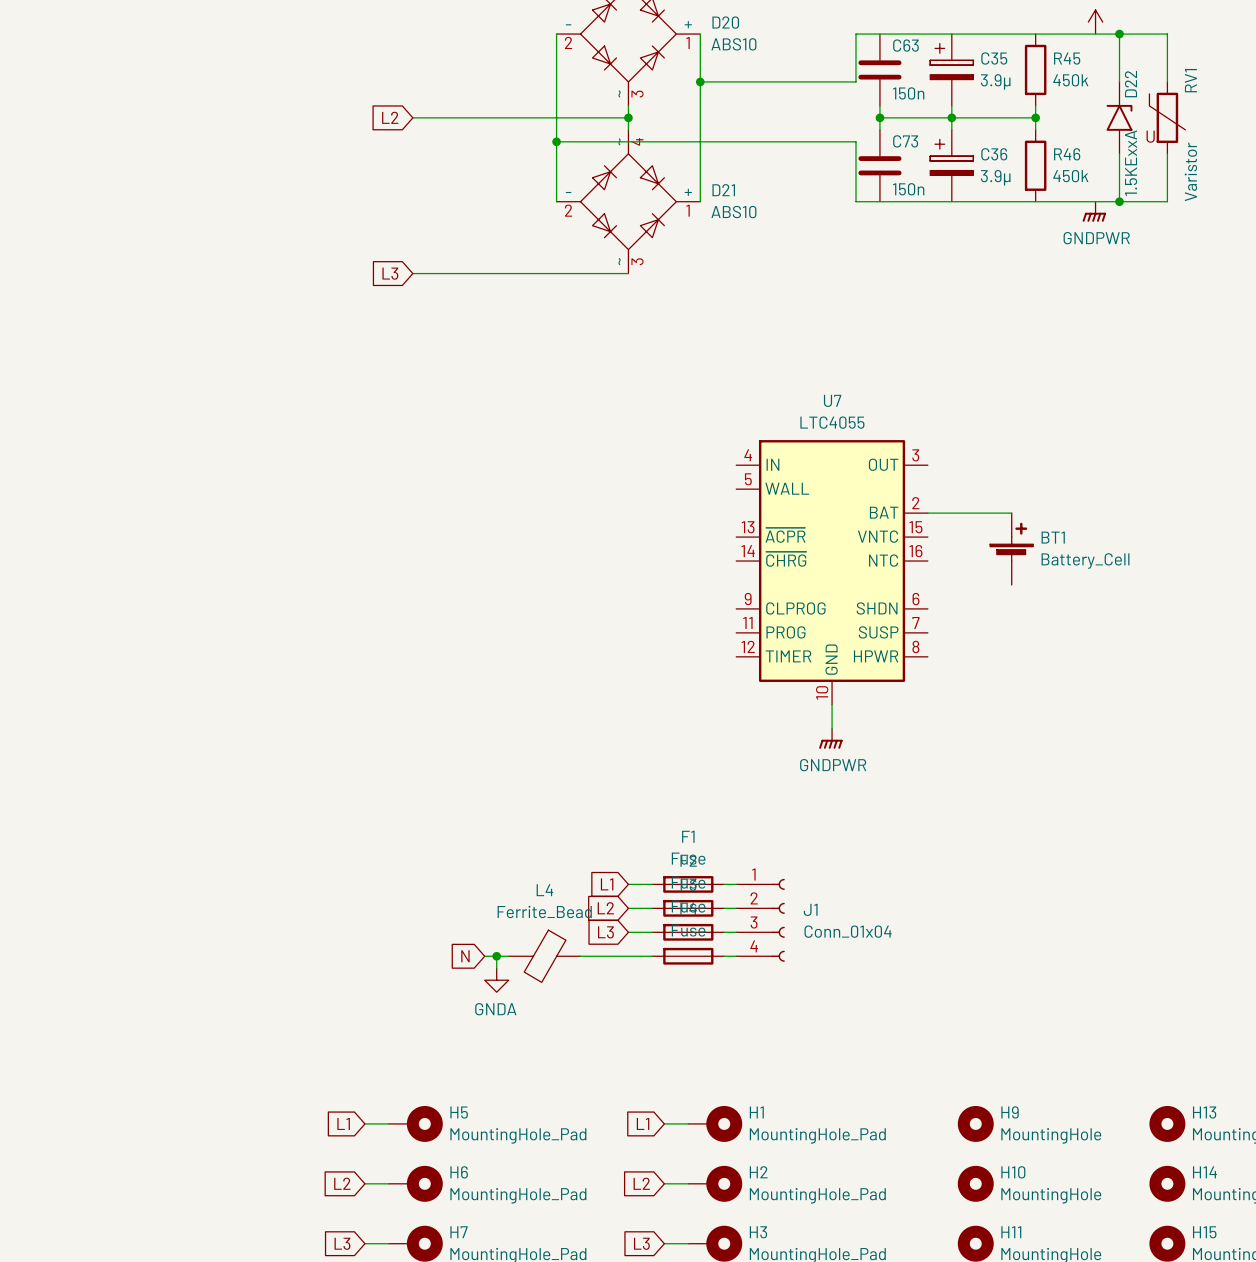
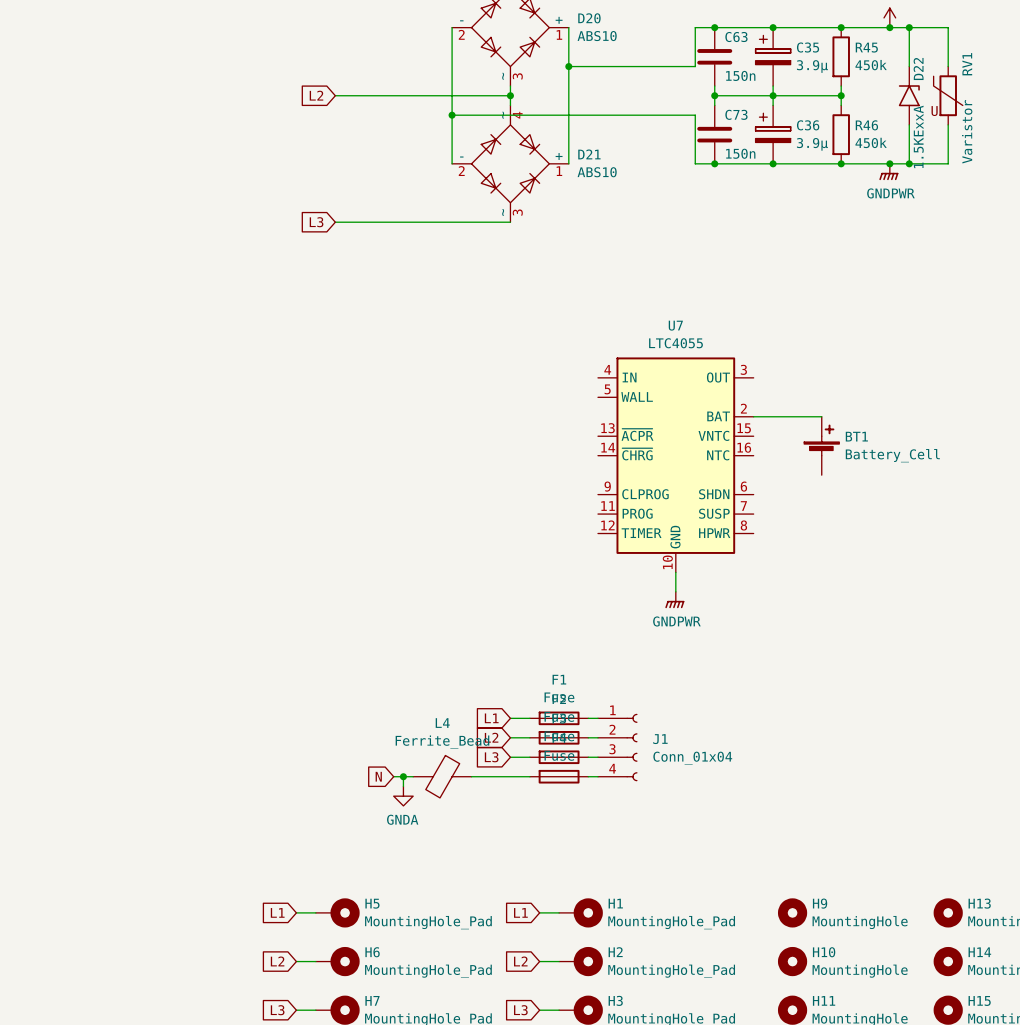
junction: none -> (714, 27)
junction: none -> (773, 27)
junction: none -> (841, 27)
junction: none -> (889, 27)
junction: none -> (714, 163)
junction: none -> (773, 163)
junction: none -> (841, 163)
junction: none -> (889, 163)

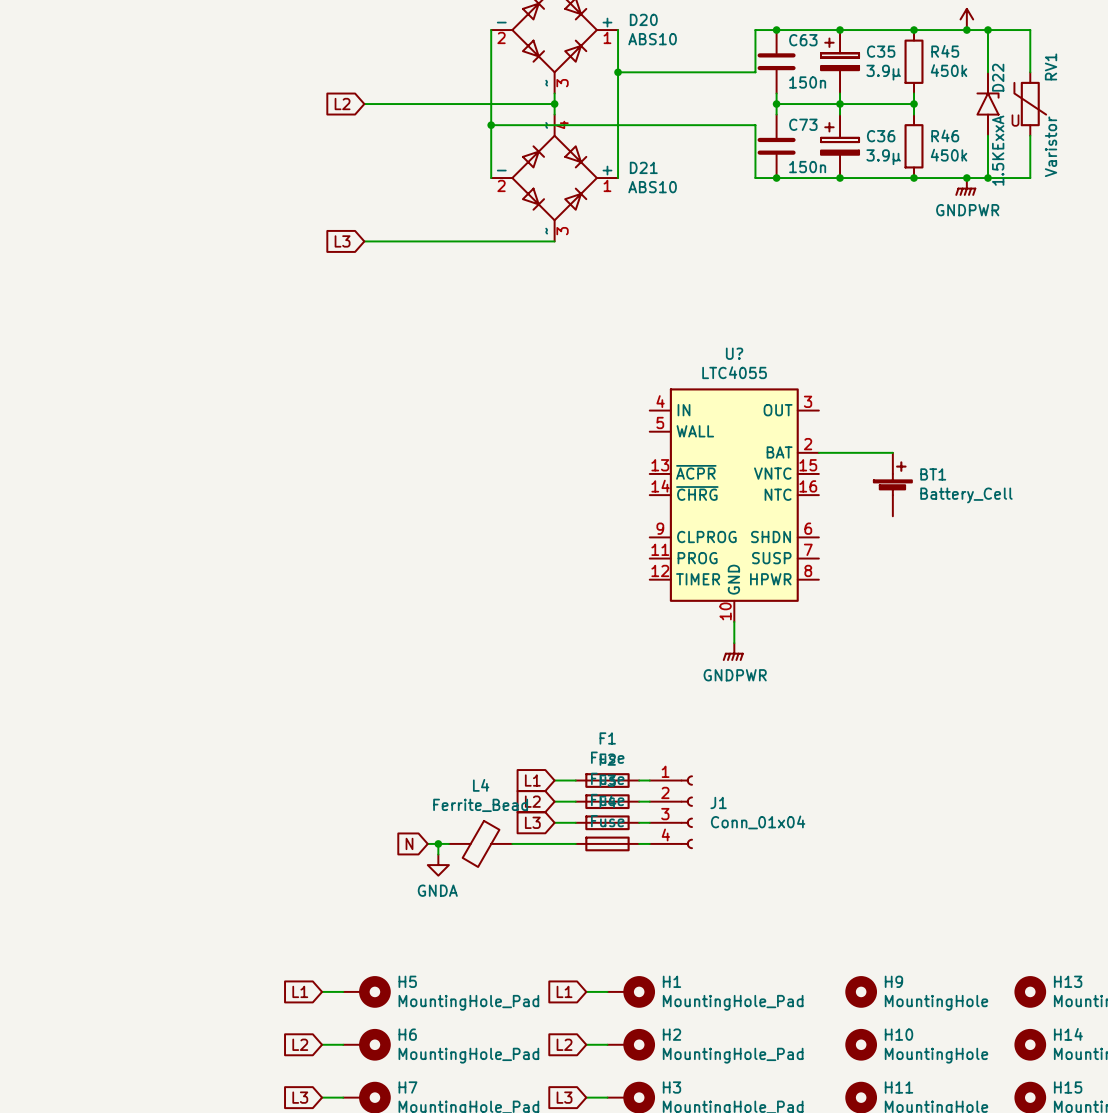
U7 name: U7 (675, 325) -> U? (734, 353)

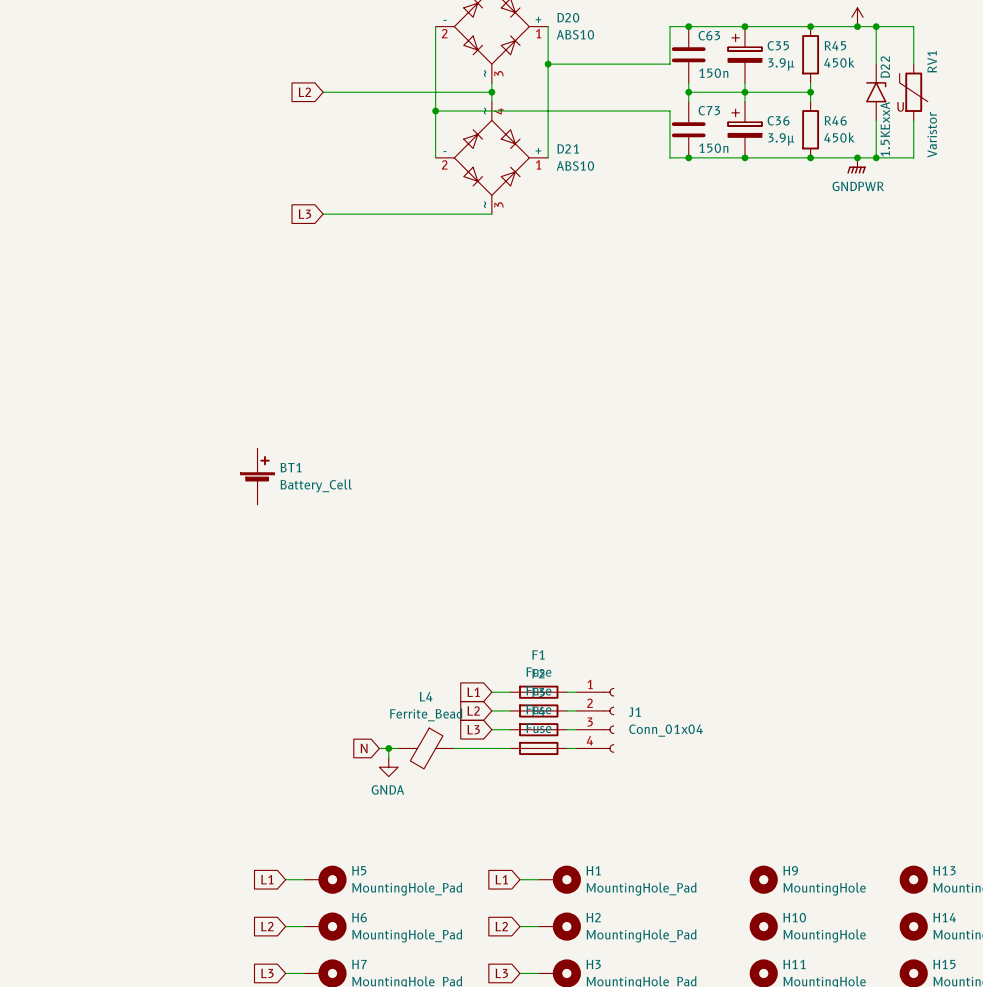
wire: (818, 452) (892, 452) -> none
BT1 position: (892, 484) -> (257, 476)
U?: LTC4055 (734, 505) -> none
wire: (734, 621) (734, 643) -> none
power symbol: GNDPWR (733, 651) -> none

